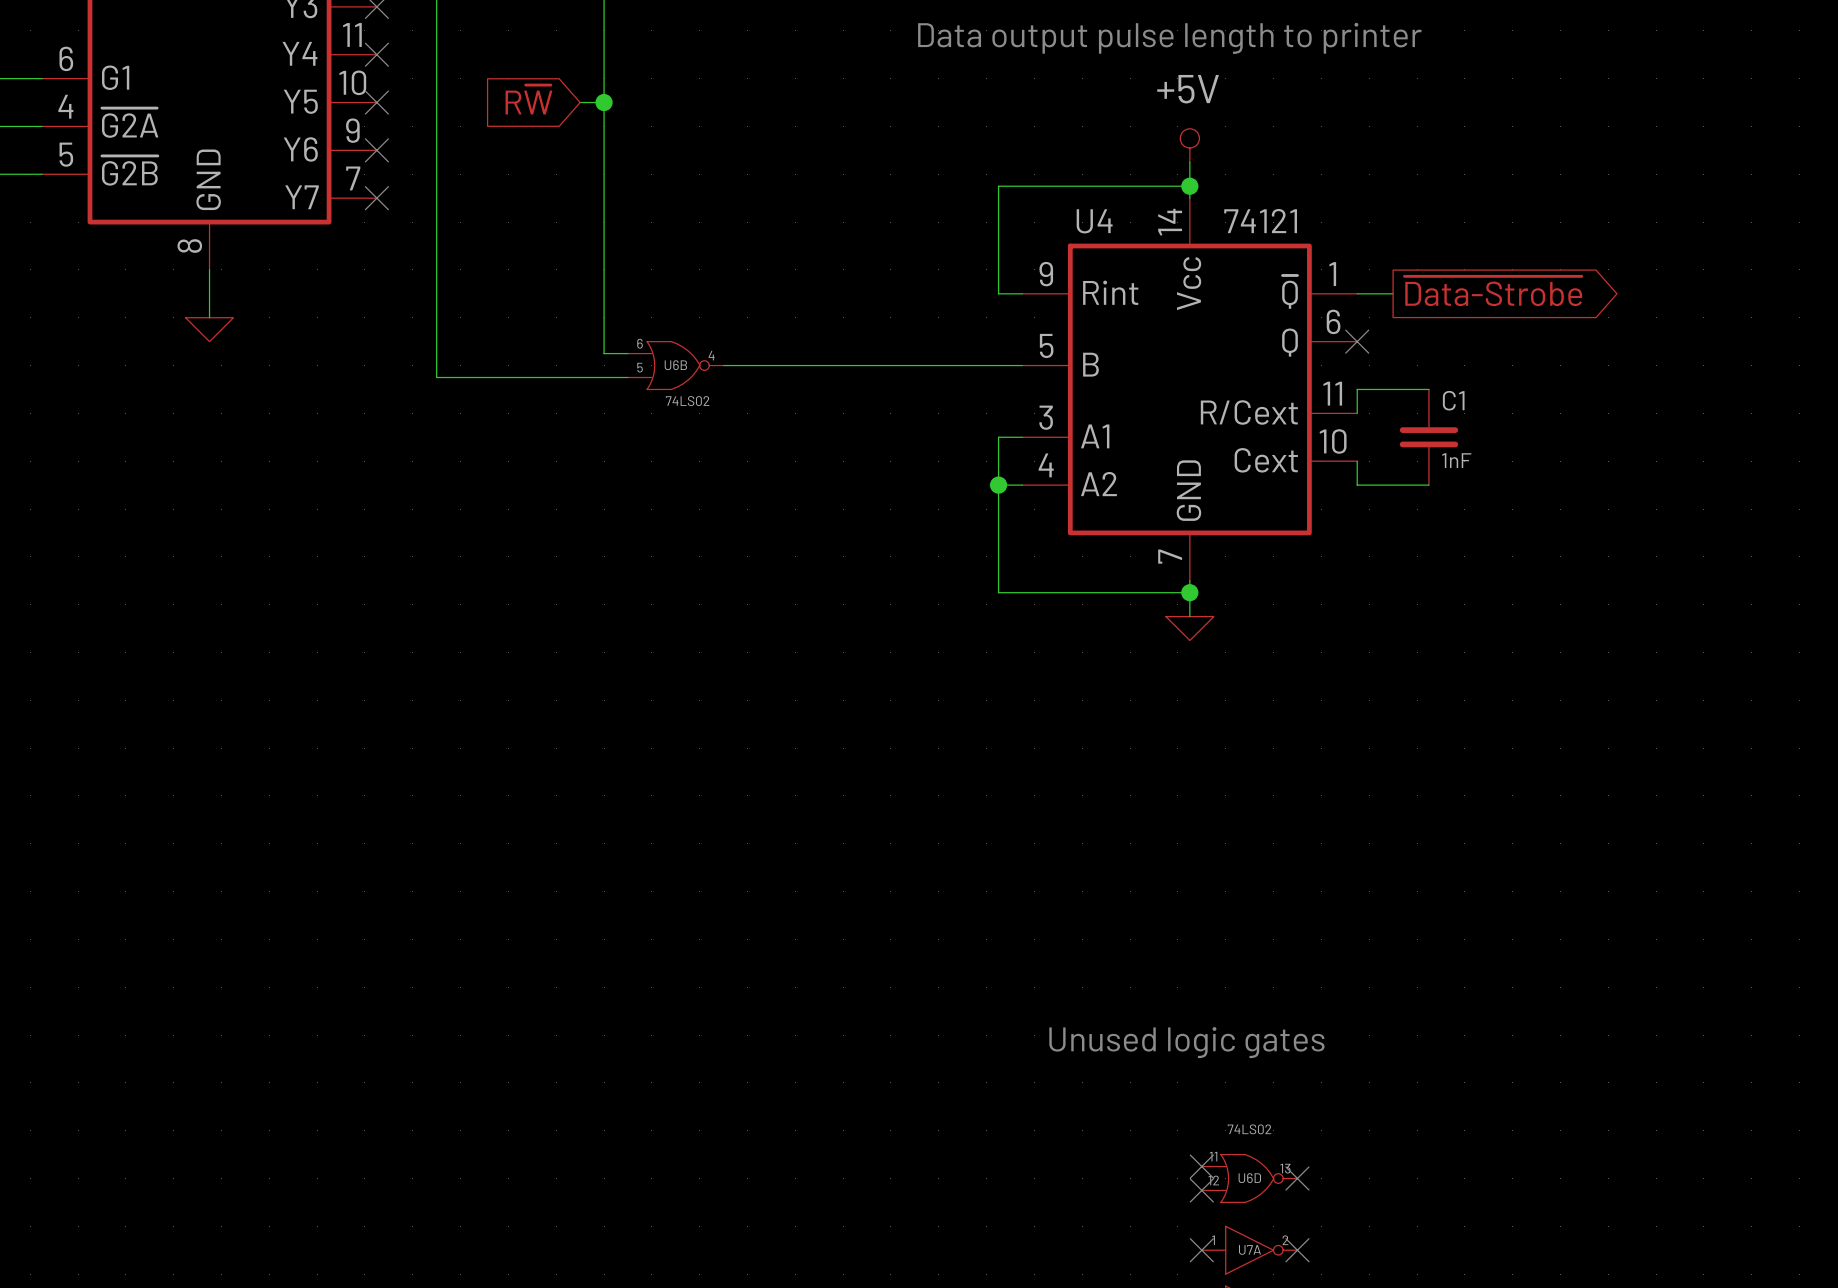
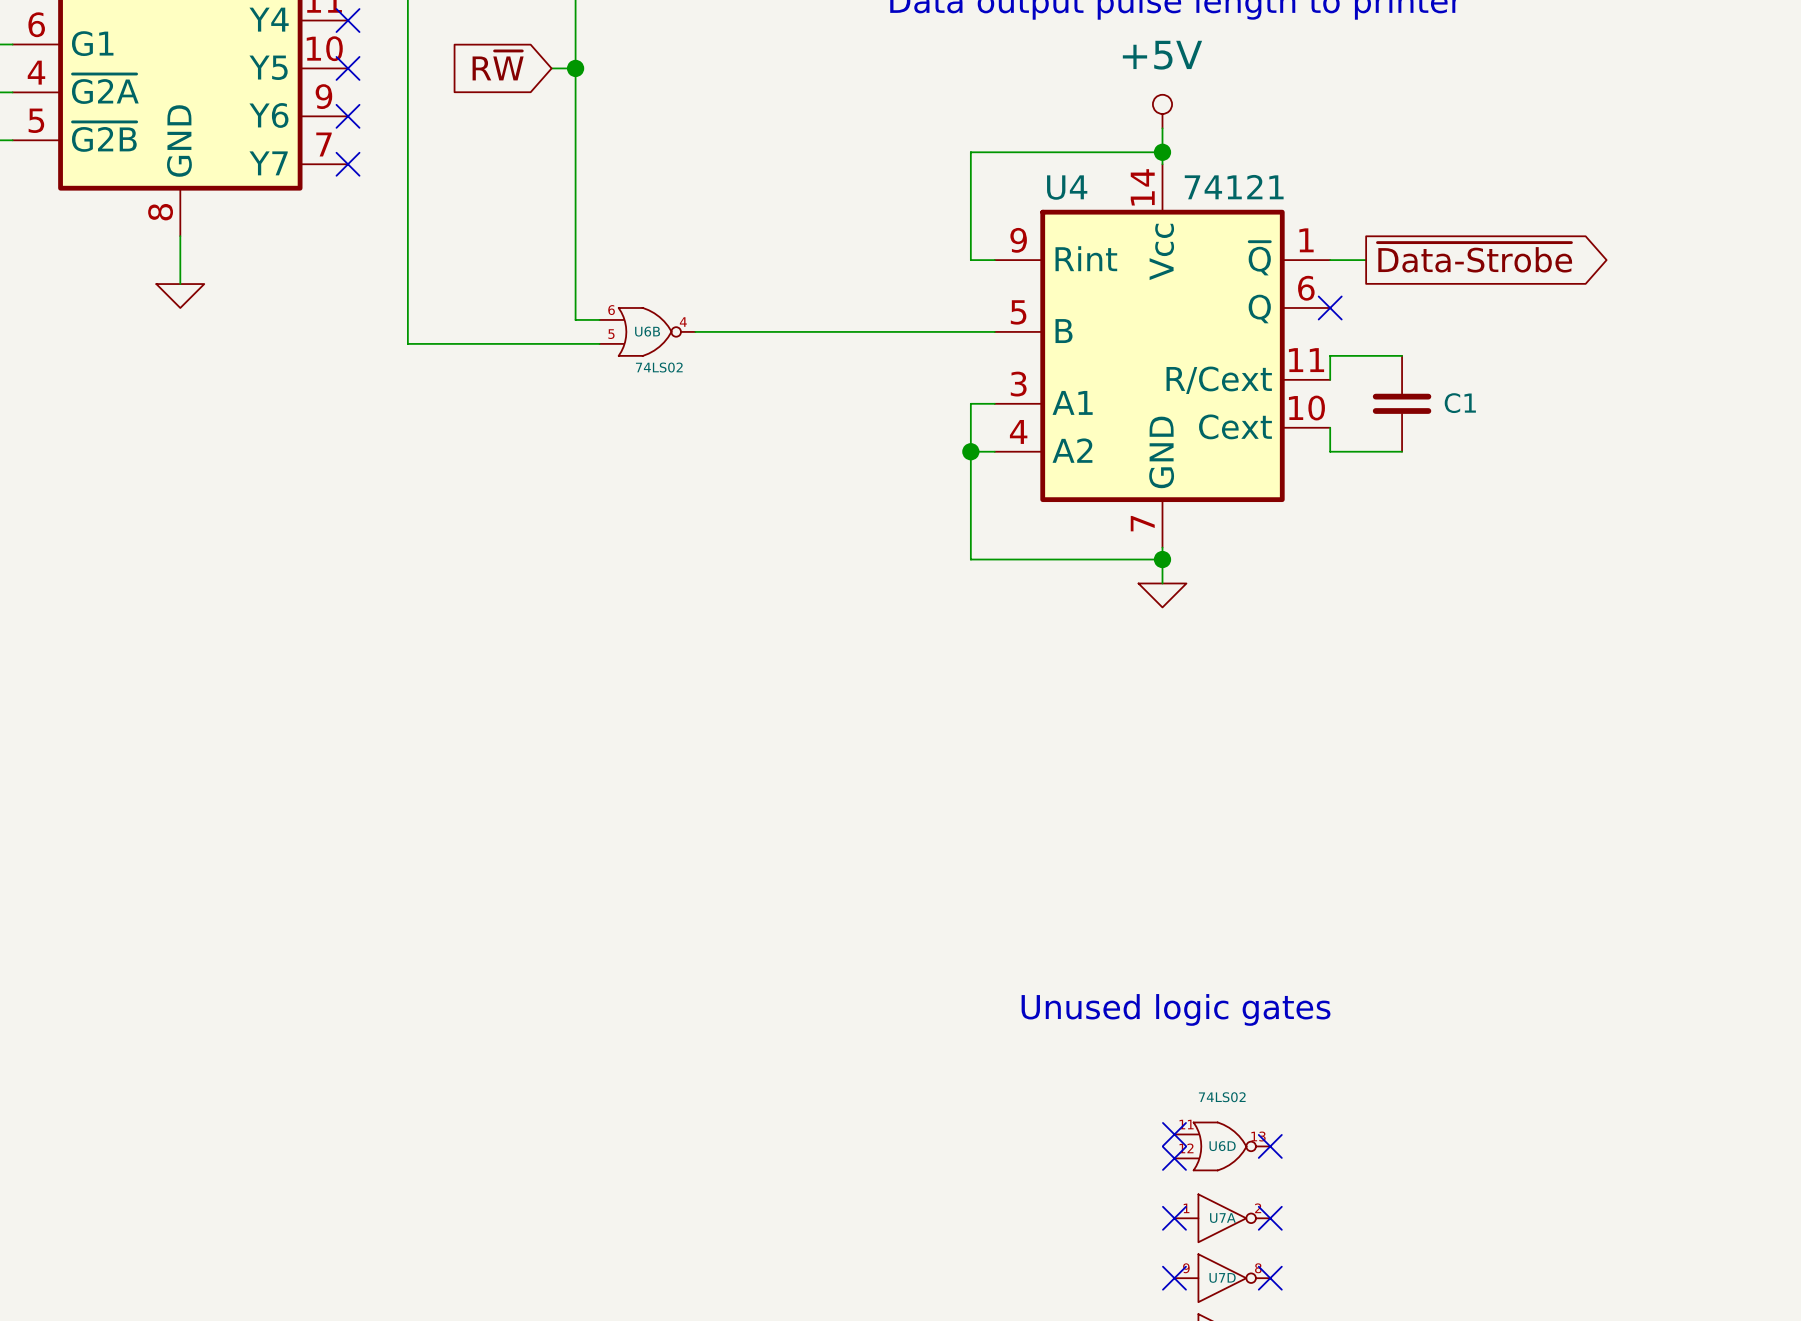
C1 name position: C1 (1453, 400) -> C1 (1460, 403)
C1 value: 1nF (1456, 460) -> none

